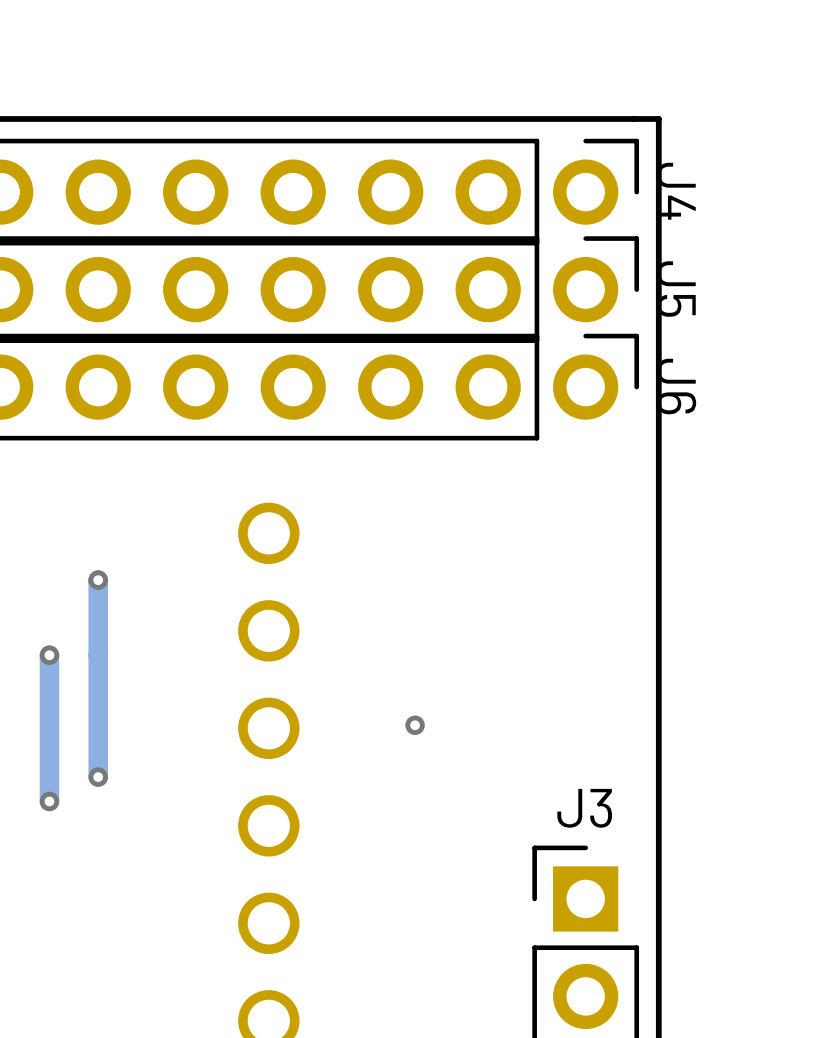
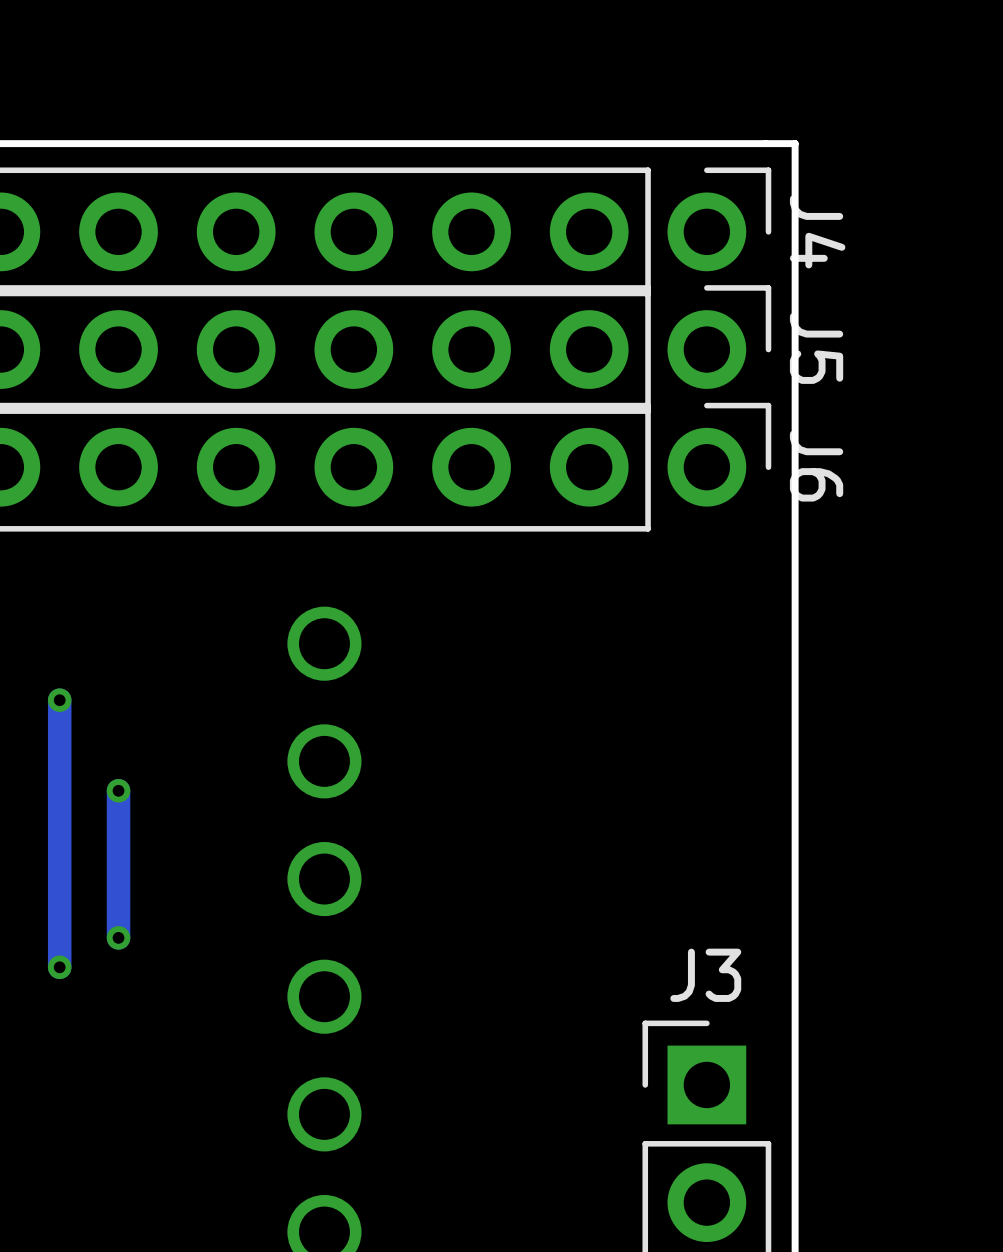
via: none -> (59, 700)
track: (98, 580) (98, 655) -> (59, 700) (59, 790)
via: (98, 580) -> none
via: (49, 655) -> none
via: none -> (118, 790)
via: (415, 725) -> none

